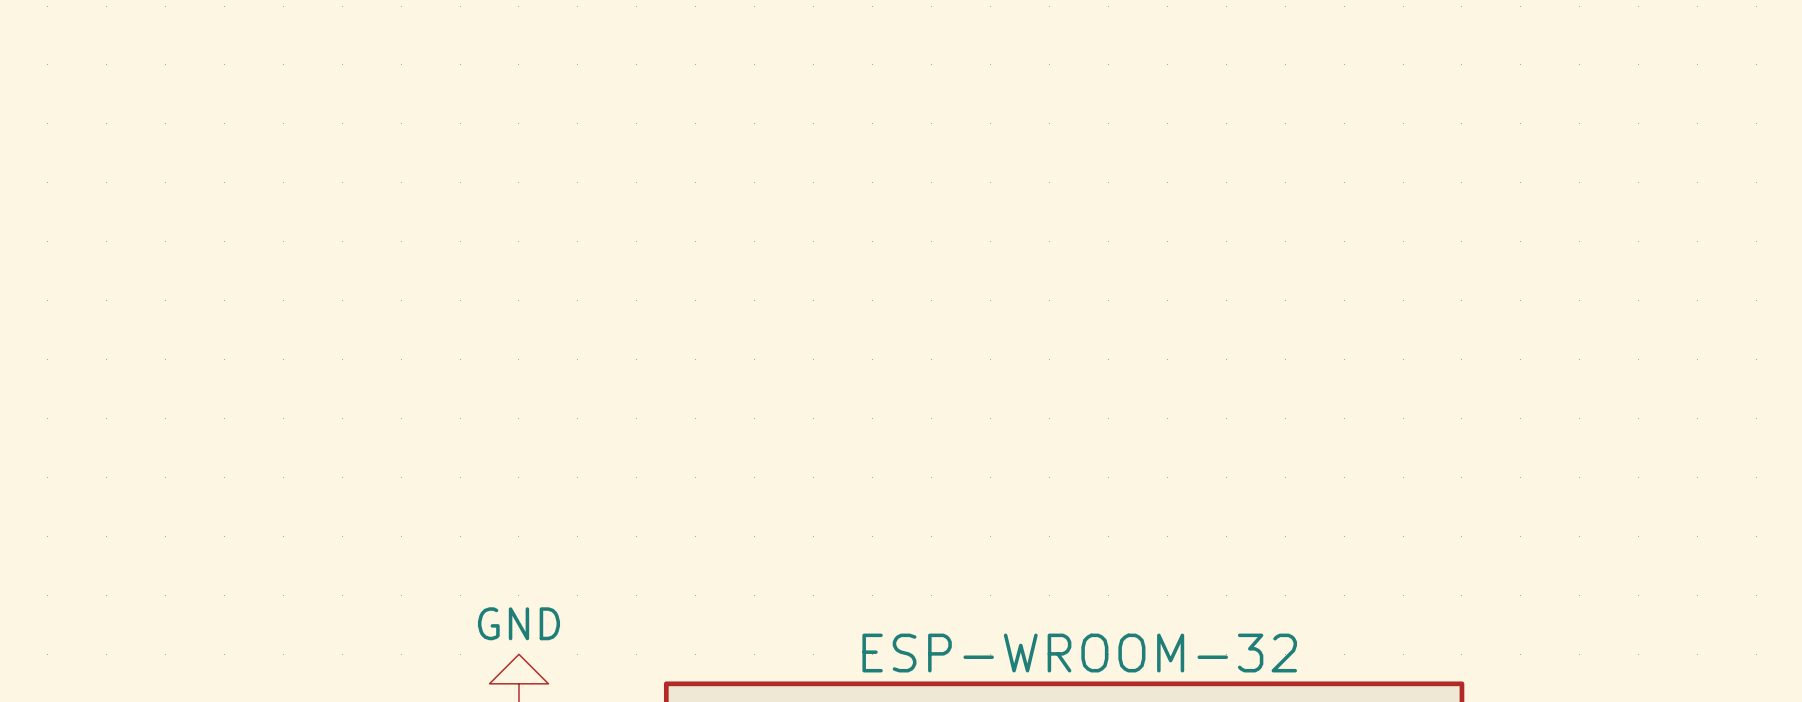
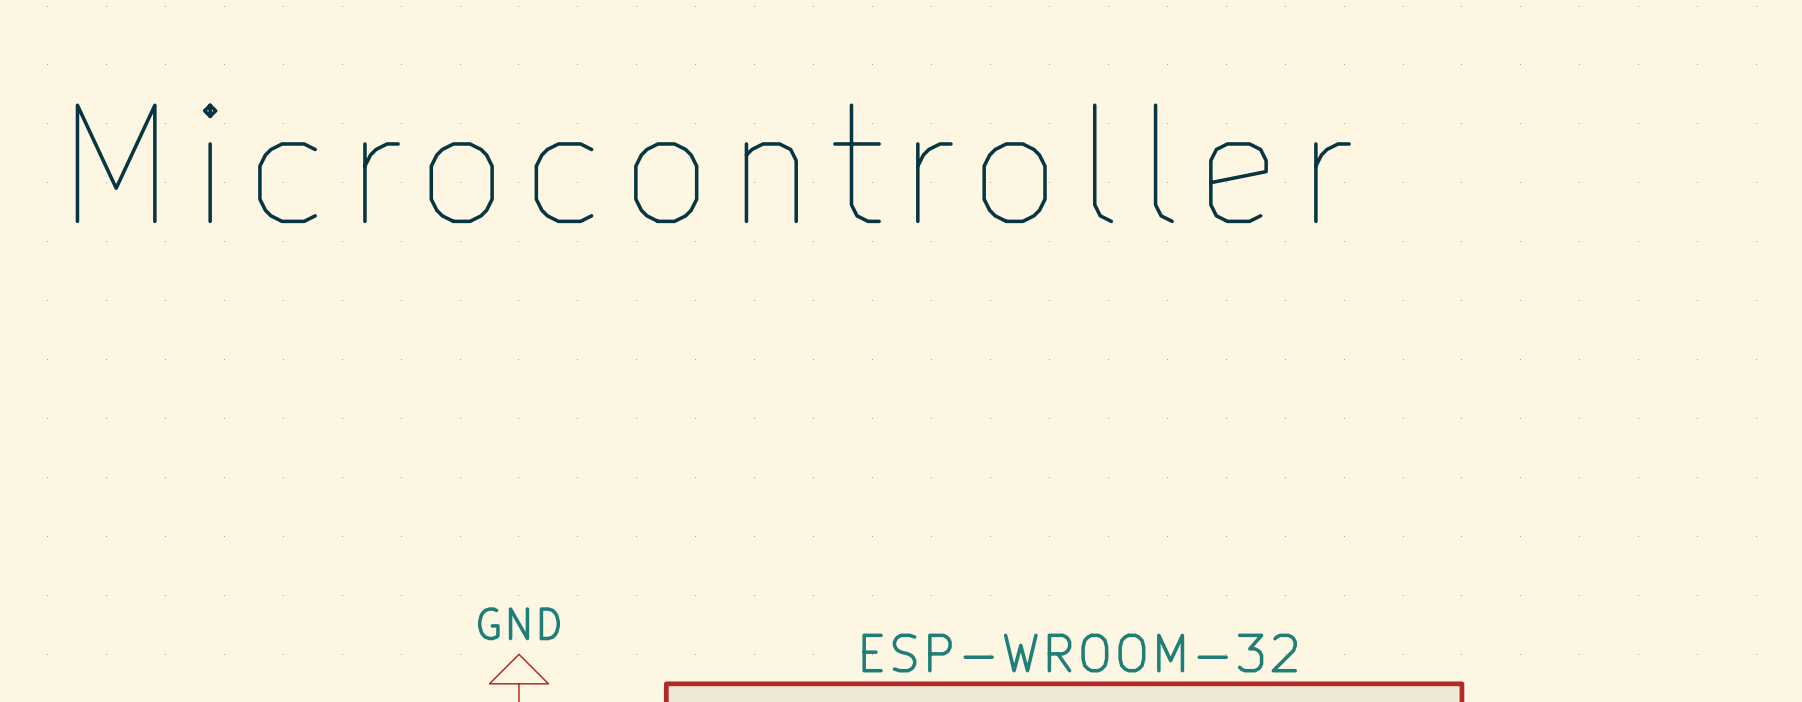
label: none -> Microcontroller (713, 163)

